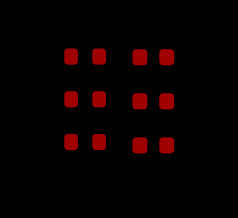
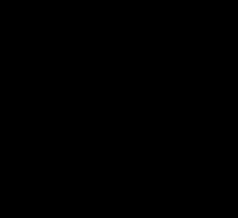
part: (85, 56) -> none
part: (153, 57) -> none
part: (85, 99) -> none
part: (153, 101) -> none
part: (85, 142) -> none
part: (153, 145) -> none

